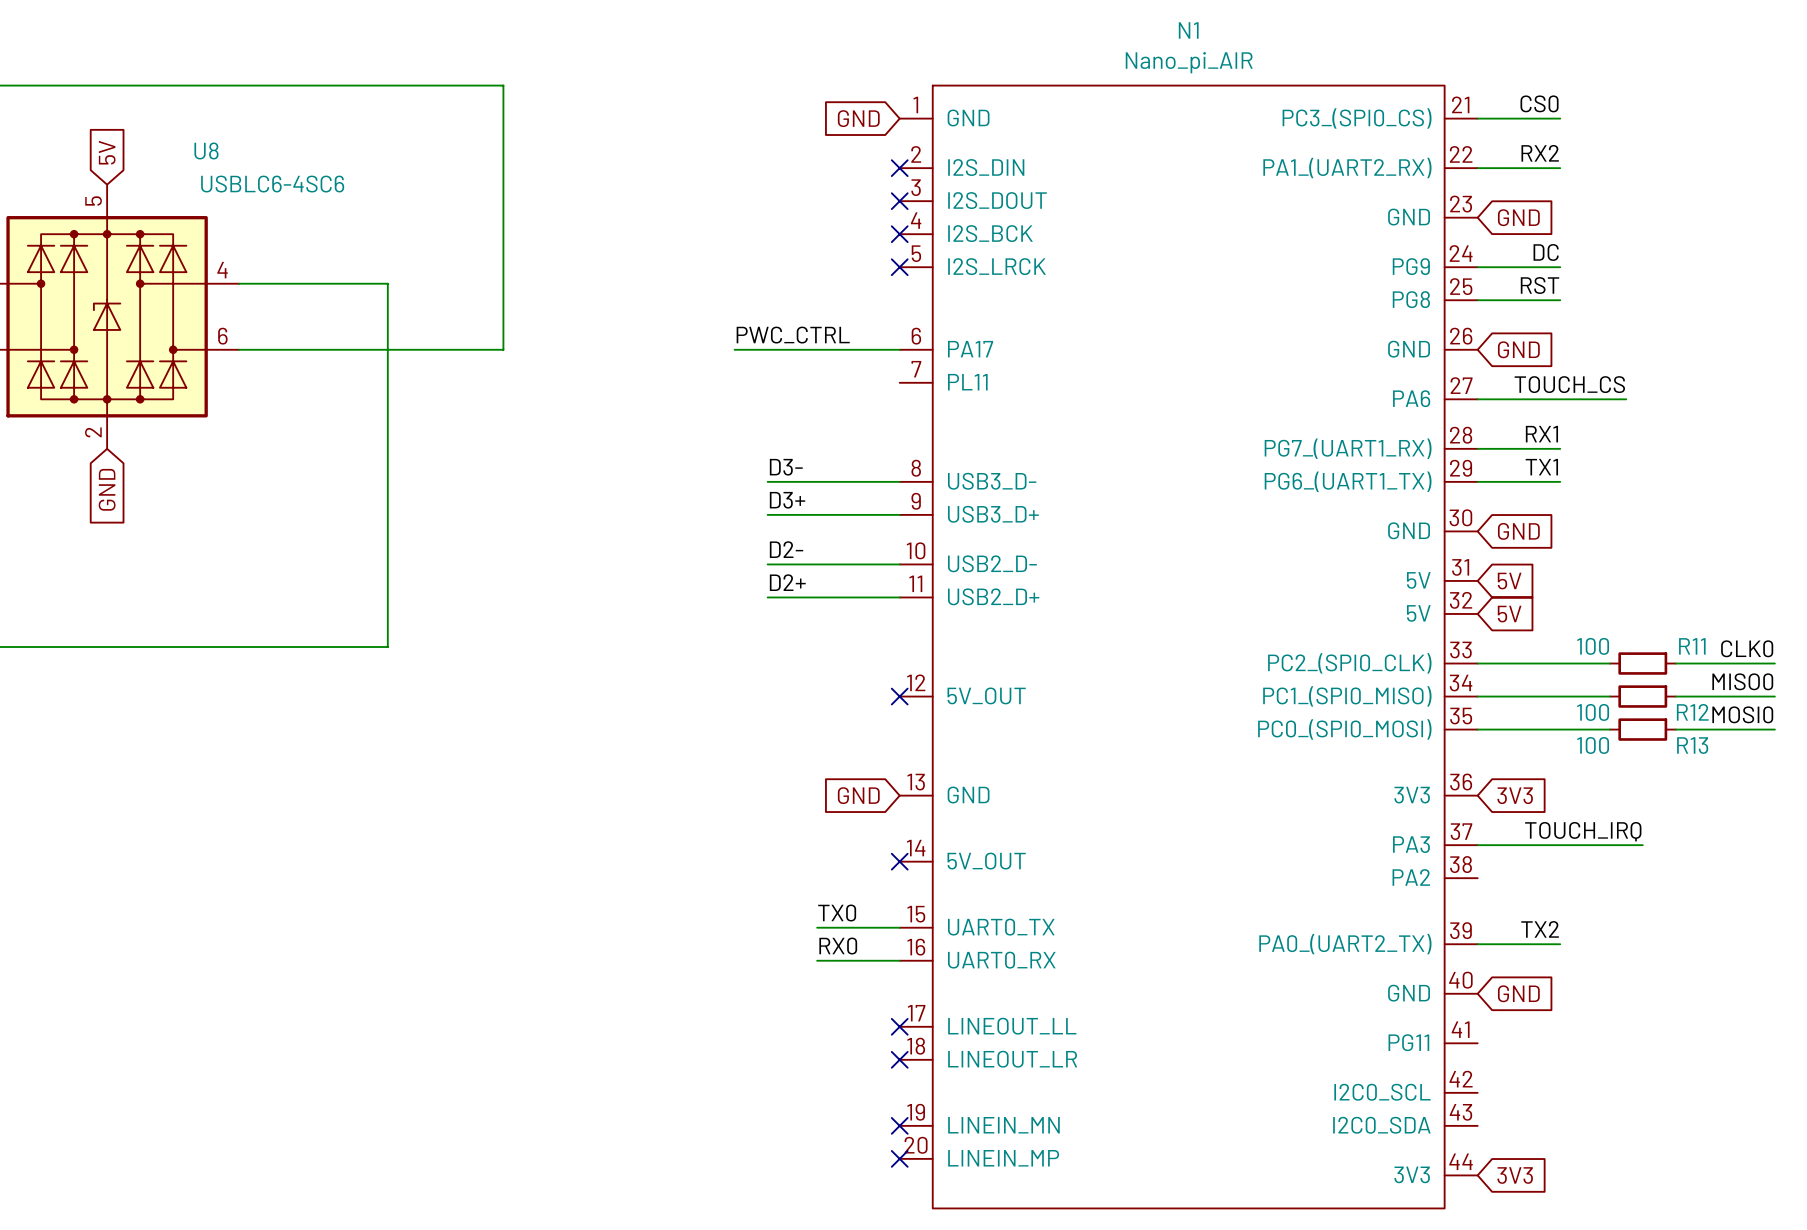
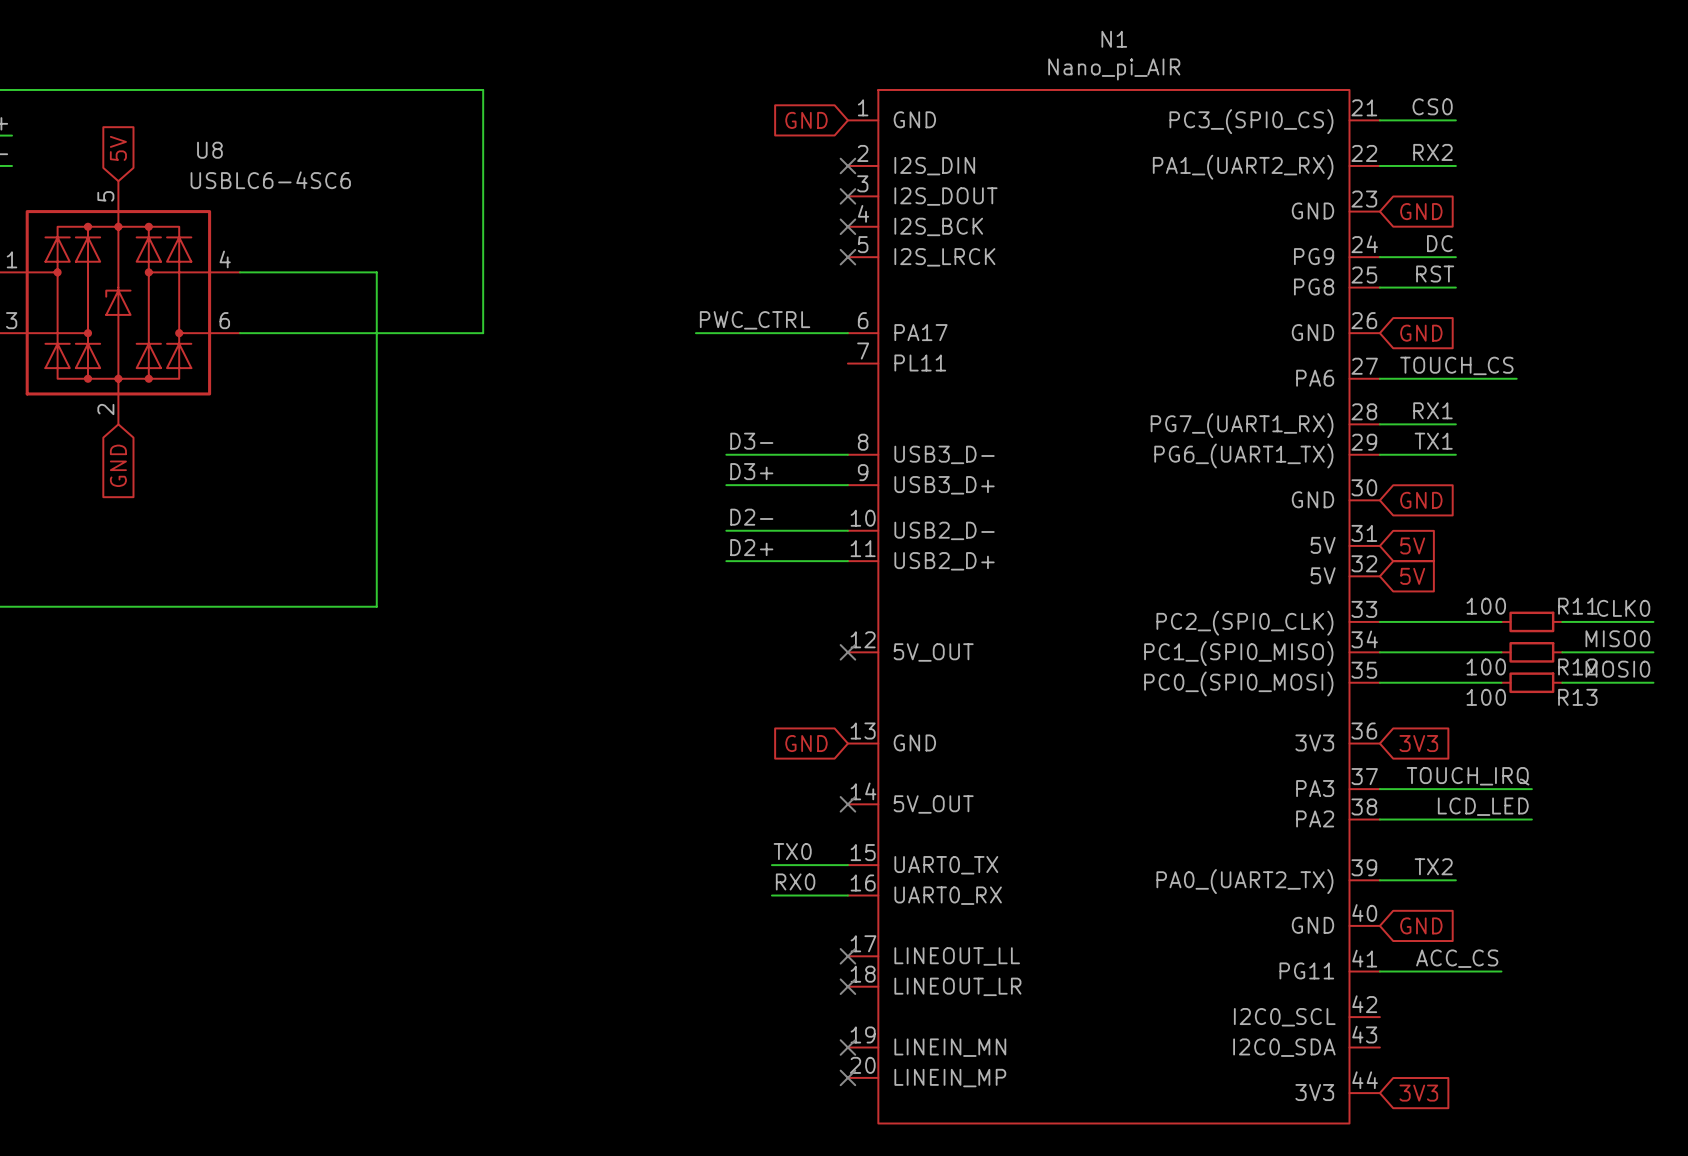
label: none -> LCD_LED (1483, 806)
wire: none -> (1379, 819) (1531, 819)
label: none -> ACC_CS (1457, 958)
wire: none -> (1379, 971) (1501, 971)

